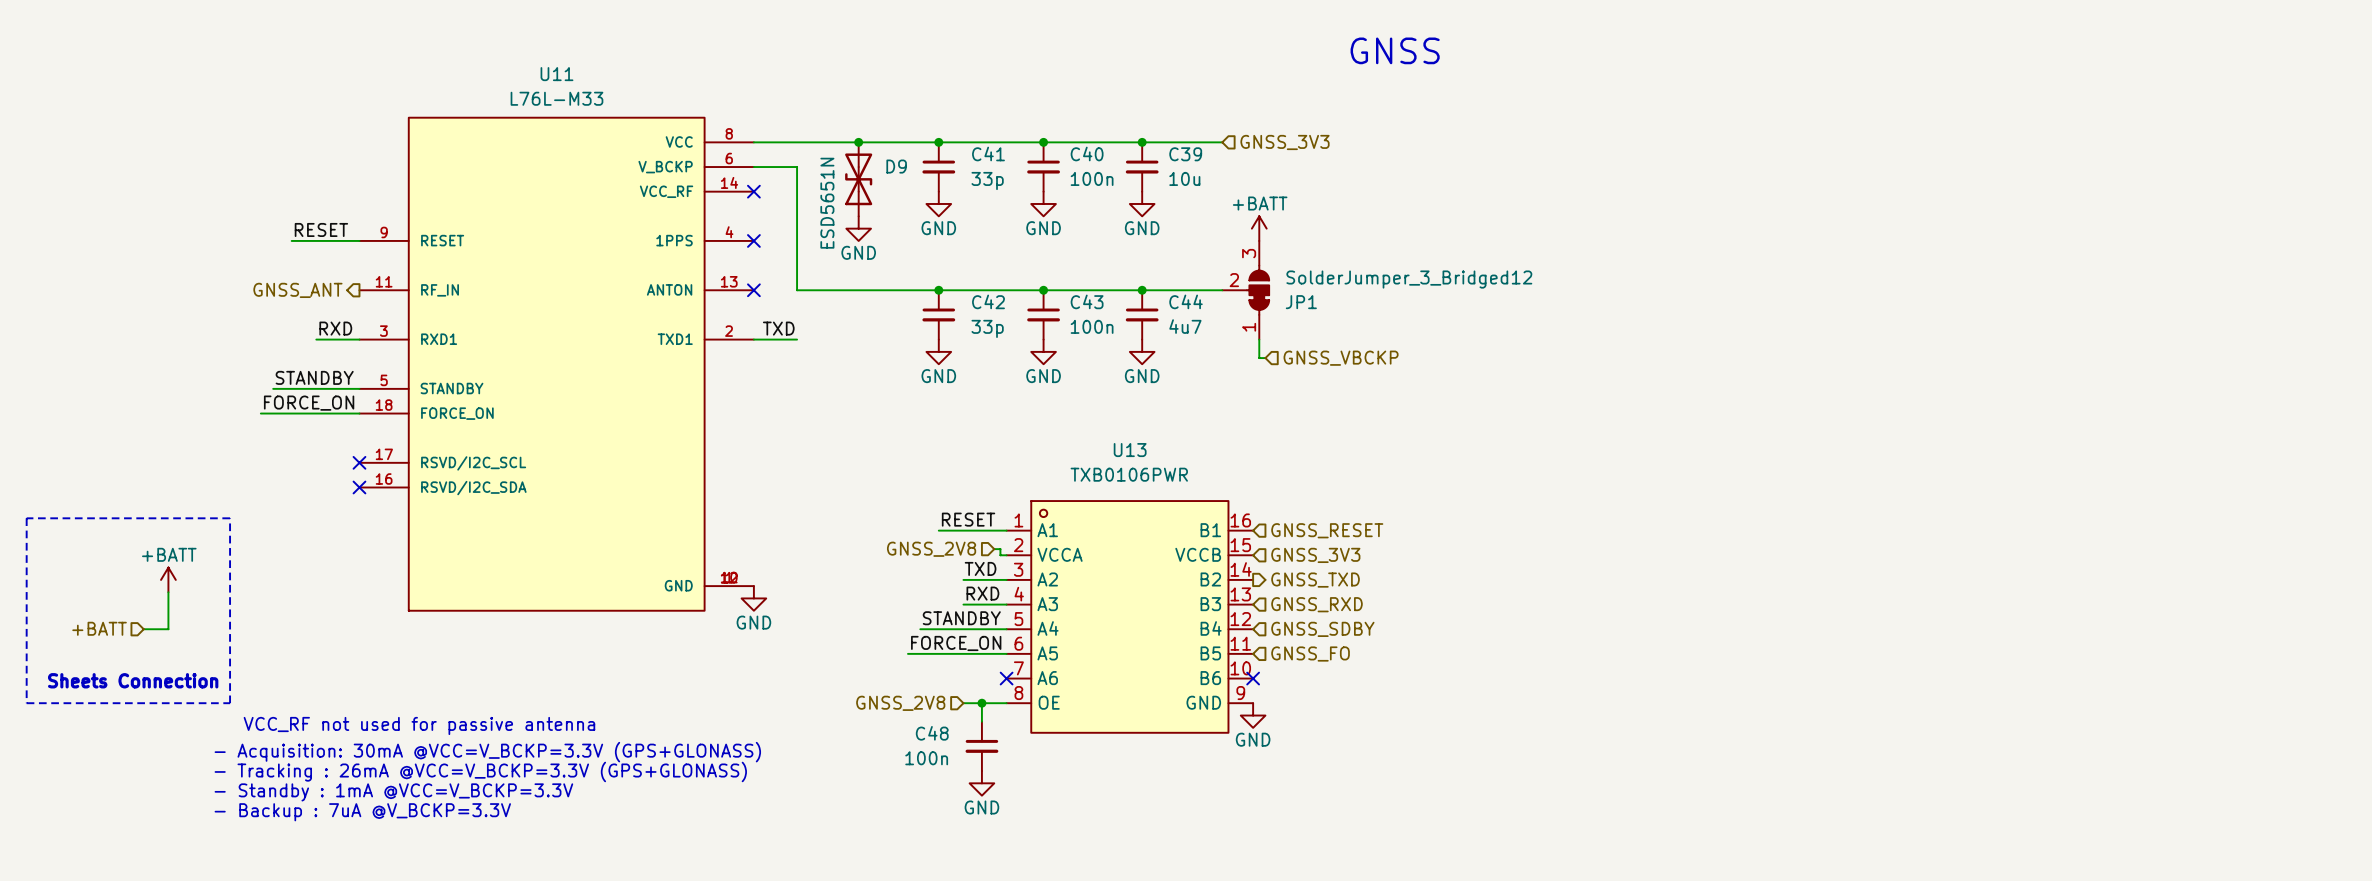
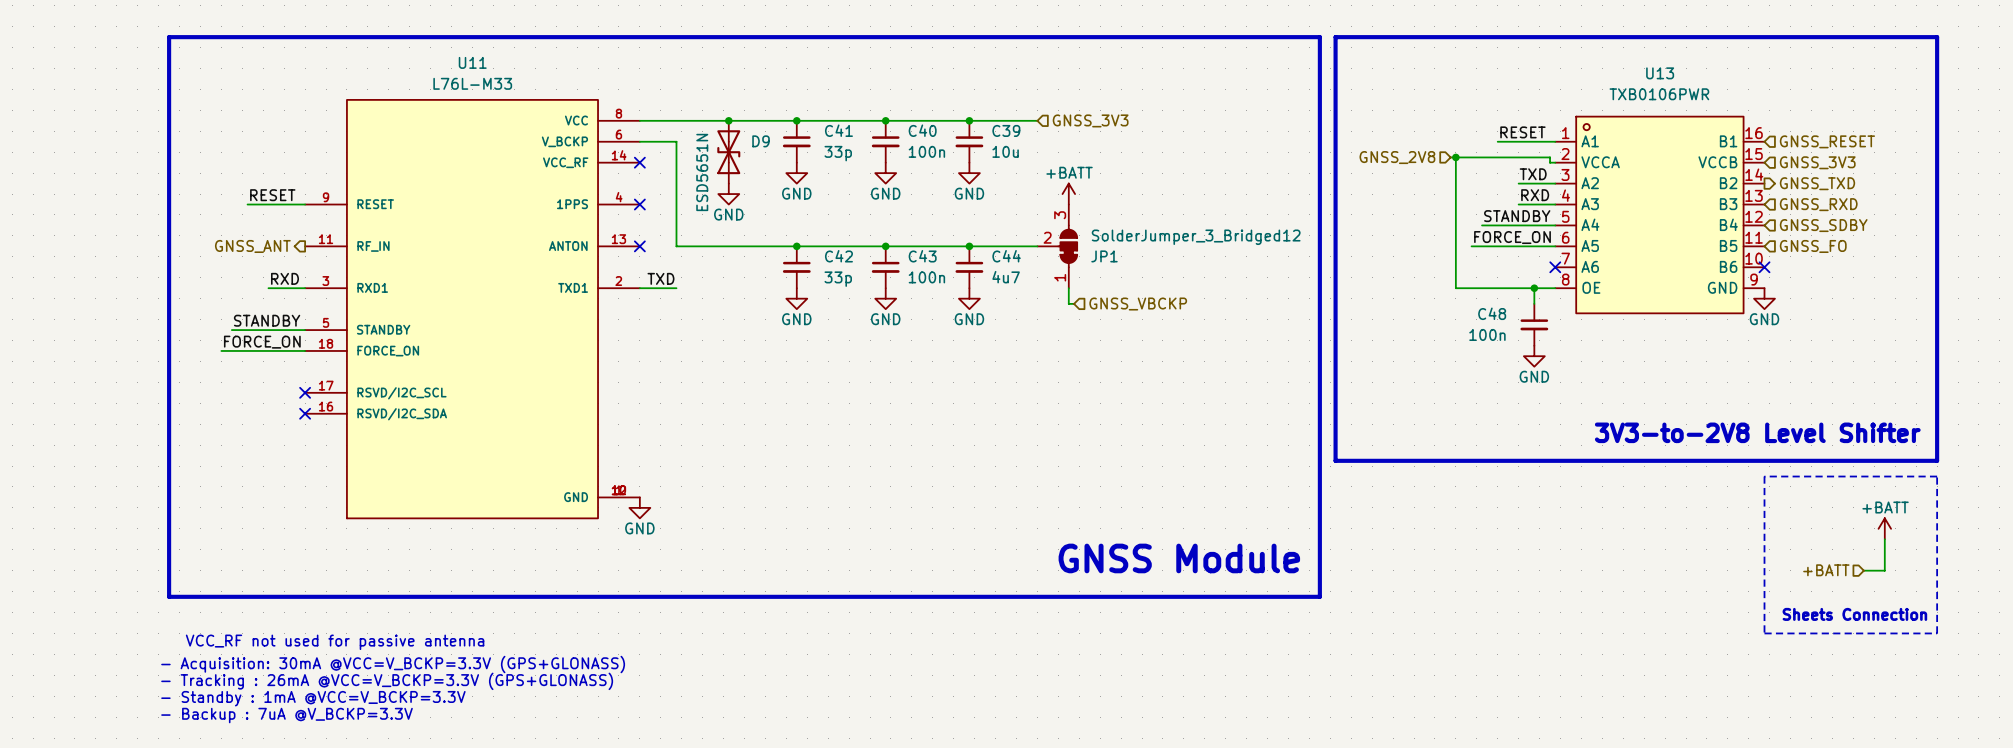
line: none -> (169, 37) (1319, 37) (1319, 596) (169, 596) (169, 37)
line: none -> (1335, 37) (1937, 37) (1937, 460) (1335, 460) (1335, 37)
text: GNSS (1395, 50) -> none
label: none -> RESET (1522, 132)
wire: none -> (1497, 141) (1555, 141)
hierarchical label: none -> GNSS_RESET (1827, 141)
hierarchical label: none -> GNSS_2V8 (1397, 157)
wire: none -> (1450, 157) (1550, 157) (1550, 162) (1555, 162)
wire: none -> (1455, 157) (1455, 288) (1555, 288)
junction: none -> (1455, 157)
hierarchical label: none -> GNSS_3V3 (1817, 162)
label: none -> TXD (1533, 174)
wire: none -> (1518, 183) (1555, 183)
hierarchical label: none -> GNSS_TXD (1817, 183)
label: none -> RXD (1535, 195)
wire: none -> (1518, 204) (1555, 204)
hierarchical label: none -> GNSS_RXD (1818, 204)
label: none -> STANDBY (1517, 216)
wire: none -> (1482, 225) (1555, 225)
hierarchical label: none -> GNSS_SDBY (1823, 225)
label: none -> FORCE_ON (1512, 237)
wire: none -> (1471, 246) (1555, 246)
hierarchical label: none -> GNSS_FO (1813, 246)
no-connect mark: none -> (1555, 267)
no-connect mark: none -> (1764, 267)
wire: none -> (1534, 288) (1534, 303)
junction: none -> (1534, 288)
power symbol: none -> GND (1764, 298)
power symbol: none -> GND (1534, 356)
text: none -> 3V3-to-2V8 Level Shifter (1757, 432)
line: (26, 518) (26, 703) (230, 703) (230, 518) (26, 518) -> none
label: RESET (968, 519) -> none
wire: (938, 530) (1006, 530) -> none
hierarchical label: GNSS_RESET (1327, 530) -> none
hierarchical label: GNSS_2V8 (931, 549) -> none
wire: (994, 549) (1000, 549) (1000, 555) (1006, 555) -> none
hierarchical label: GNSS_3V3 (1315, 555) -> none
line: none -> (1764, 476) (1764, 633) (1937, 633) (1937, 476) (1764, 476)
label: TXD (980, 568) -> none
power symbol: +BATT (168, 579) -> none
wire: (963, 579) (1006, 579) -> none
hierarchical label: GNSS_TXD (1315, 580) -> none
wire: (168, 592) (168, 629) (143, 629) -> none
label: RXD (982, 593) -> none
wire: (963, 604) (1006, 604) -> none
hierarchical label: GNSS_RXD (1316, 604) -> none
U13 position: (1129, 616) -> (1659, 214)
label: STANDBY (961, 618) -> none
power symbol: none -> +BATT (1884, 528)
hierarchical label: +BATT (99, 628) -> none
wire: (920, 629) (1006, 629) -> none
hierarchical label: GNSS_SDBY (1322, 629) -> none
wire: none -> (1884, 539) (1884, 570) (1863, 570)
label: FORCE_ON (956, 643) -> none
wire: (907, 653) (1006, 653) -> none
hierarchical label: GNSS_FO (1310, 654) -> none
text: none -> GNSS Module (1179, 558)
hierarchical label: none -> +BATT (1826, 570)
no-connect mark: (1006, 678) -> none
no-connect mark: (1253, 678) -> none
text: Sheets Connection (133, 680) -> none
hierarchical label: GNSS_2V8 (900, 703) -> none
wire: (981, 703) (981, 721) -> none
junction: (981, 703) -> none
power symbol: GND (1253, 715) -> none
text: none -> Sheets Connection (1854, 614)
text position: VCC_RF not used for passive antenna (419, 725) -> VCC_RF not used for passive antenna (335, 642)
C48 position: (981, 746) -> (1534, 324)
text position: - Acquisition: 30mA @VCC=V_BCKP=3.3V (GPS+GLONASS) (487, 752) -> - Acquisition: 30mA @VCC=V_BCKP=3.3V (GPS+GLONASS) (393, 664)
text position: - Tracking : 26mA @VCC=V_BCKP=3.3V (GPS+GLONASS) (480, 771) -> - Tracking : 26mA @VCC=V_BCKP=3.3V (GPS+GLONASS) (387, 681)
power symbol: GND (981, 783) -> none
text position: - Standby : 1mA @VCC=V_BCKP=3.3V (393, 792) -> - Standby : 1mA @VCC=V_BCKP=3.3V (313, 698)
text position: - Backup : 7uA @V_BCKP=3.3V (362, 812) -> - Backup : 7uA @V_BCKP=3.3V (286, 715)

